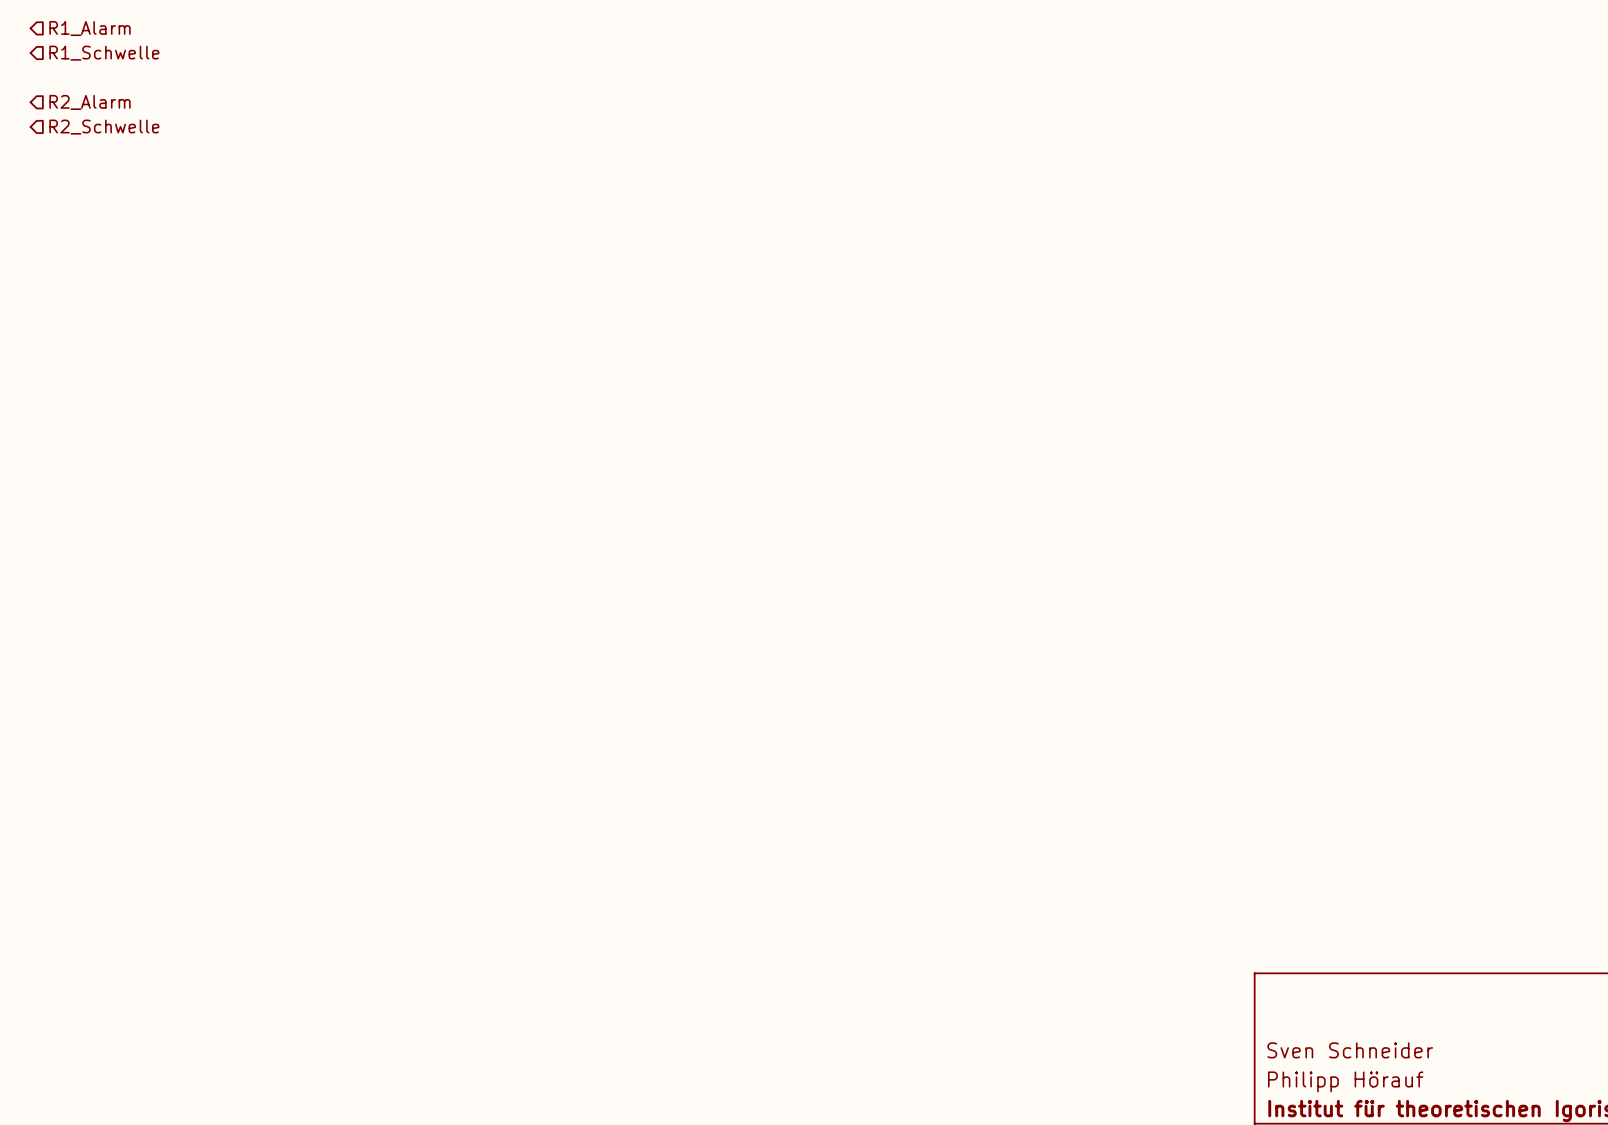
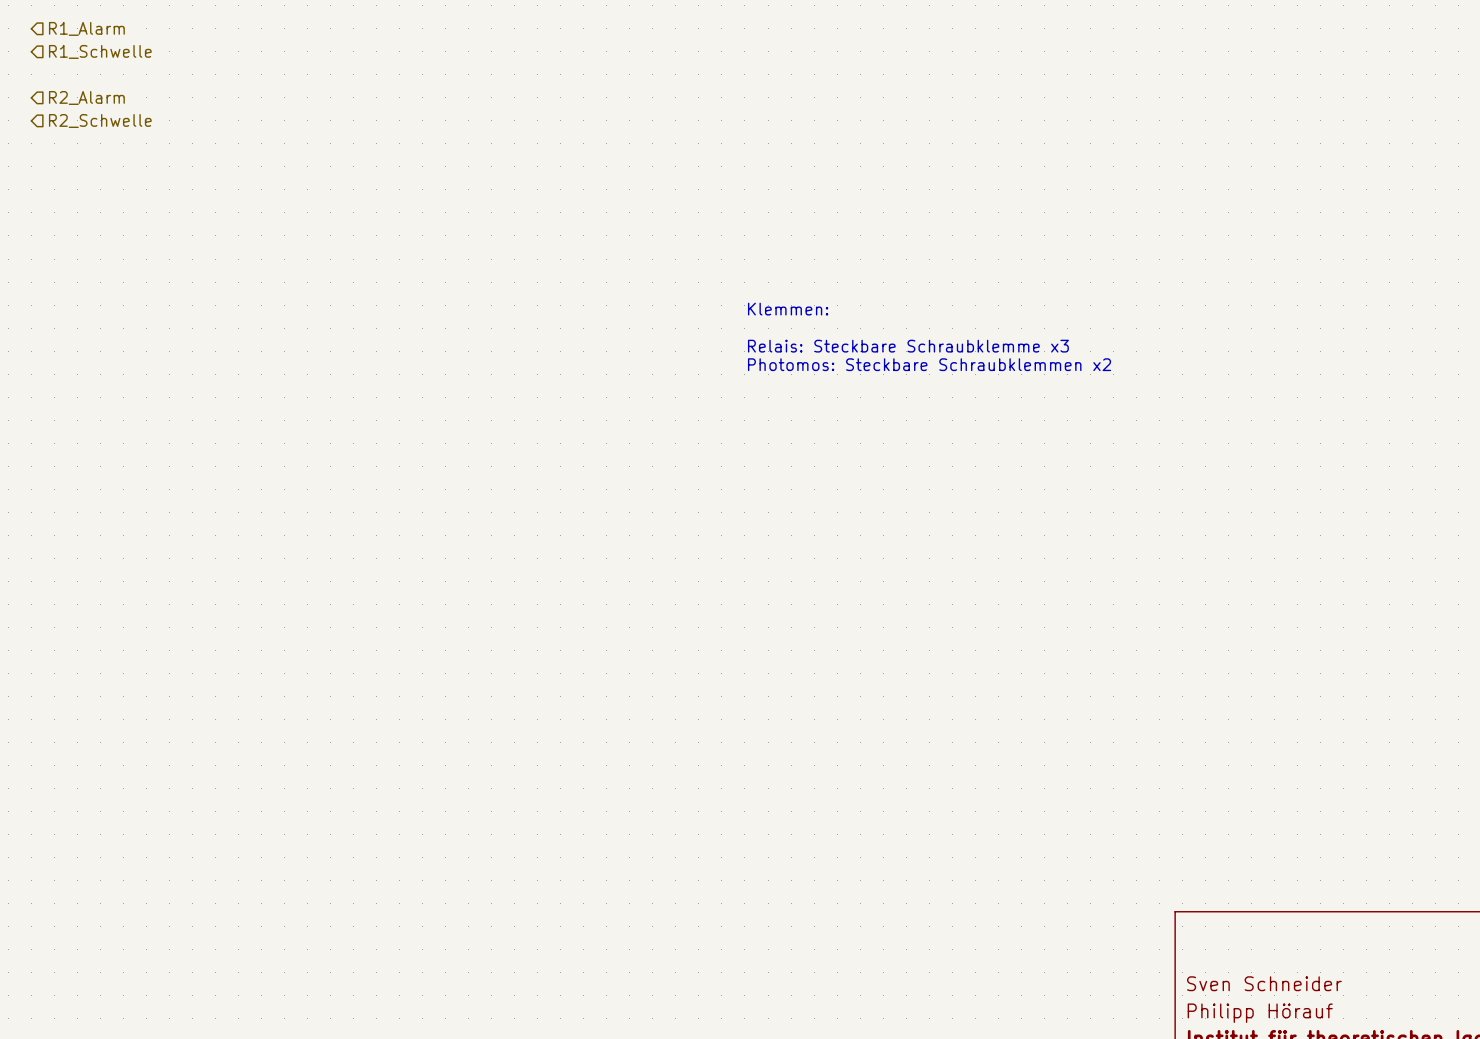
text: none -> Klemmen: (788, 309)
text: none -> Relais: Steckbare Schraubklemme x3 (908, 346)
text: none -> Photomos: Steckbare Schraubklemmen x2 (929, 364)

